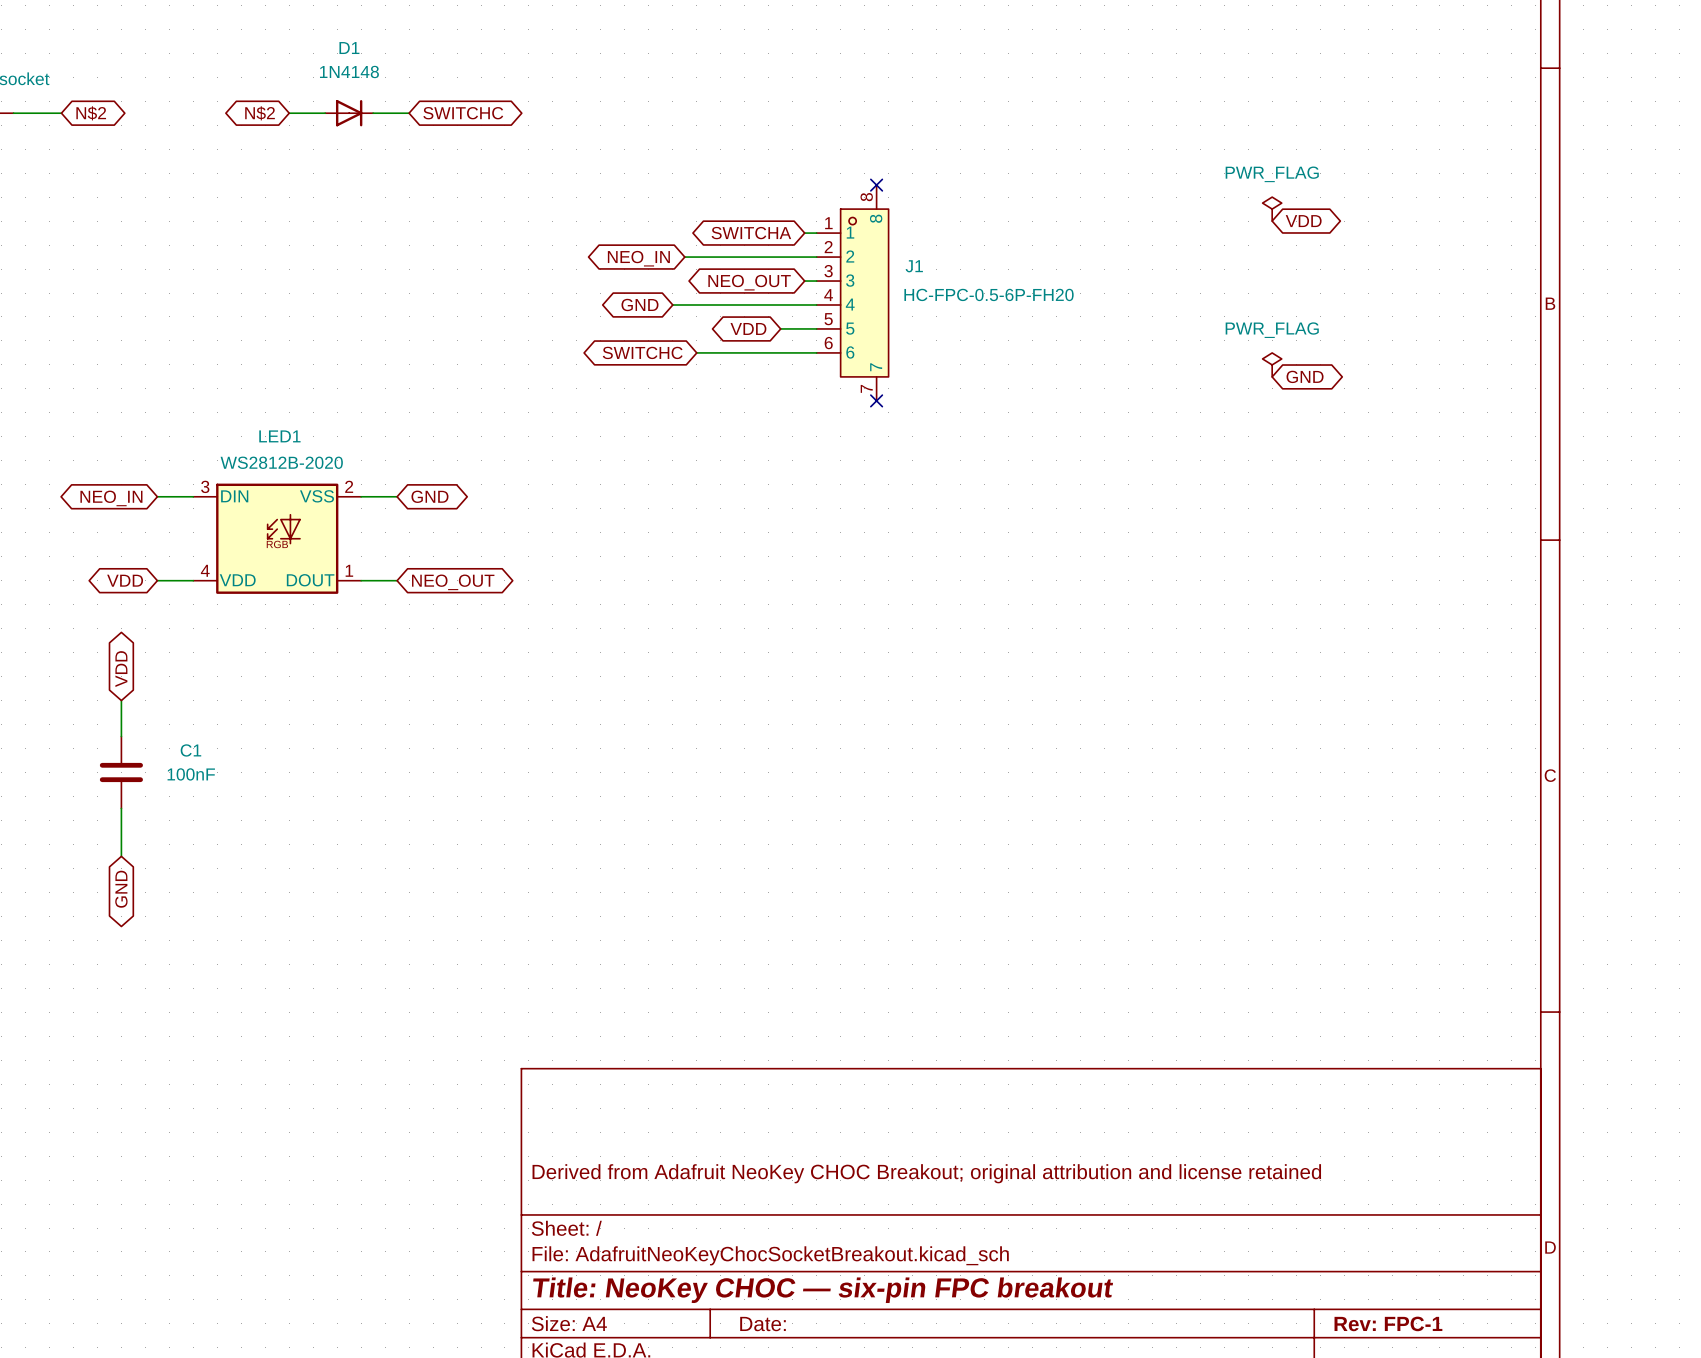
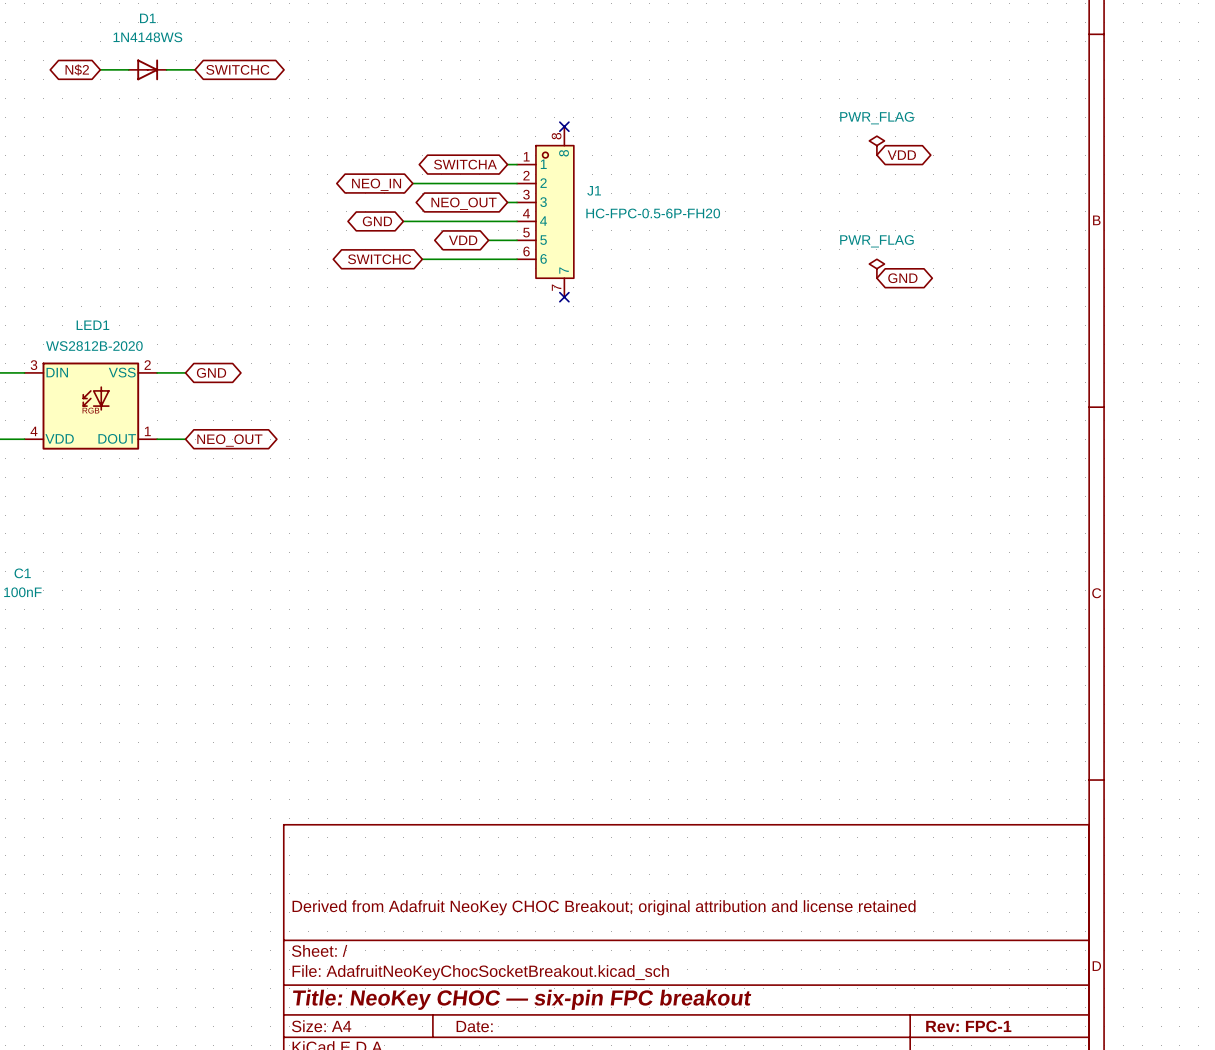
D1 value: 1N4148 (349, 71) -> 1N4148WS (147, 37)

